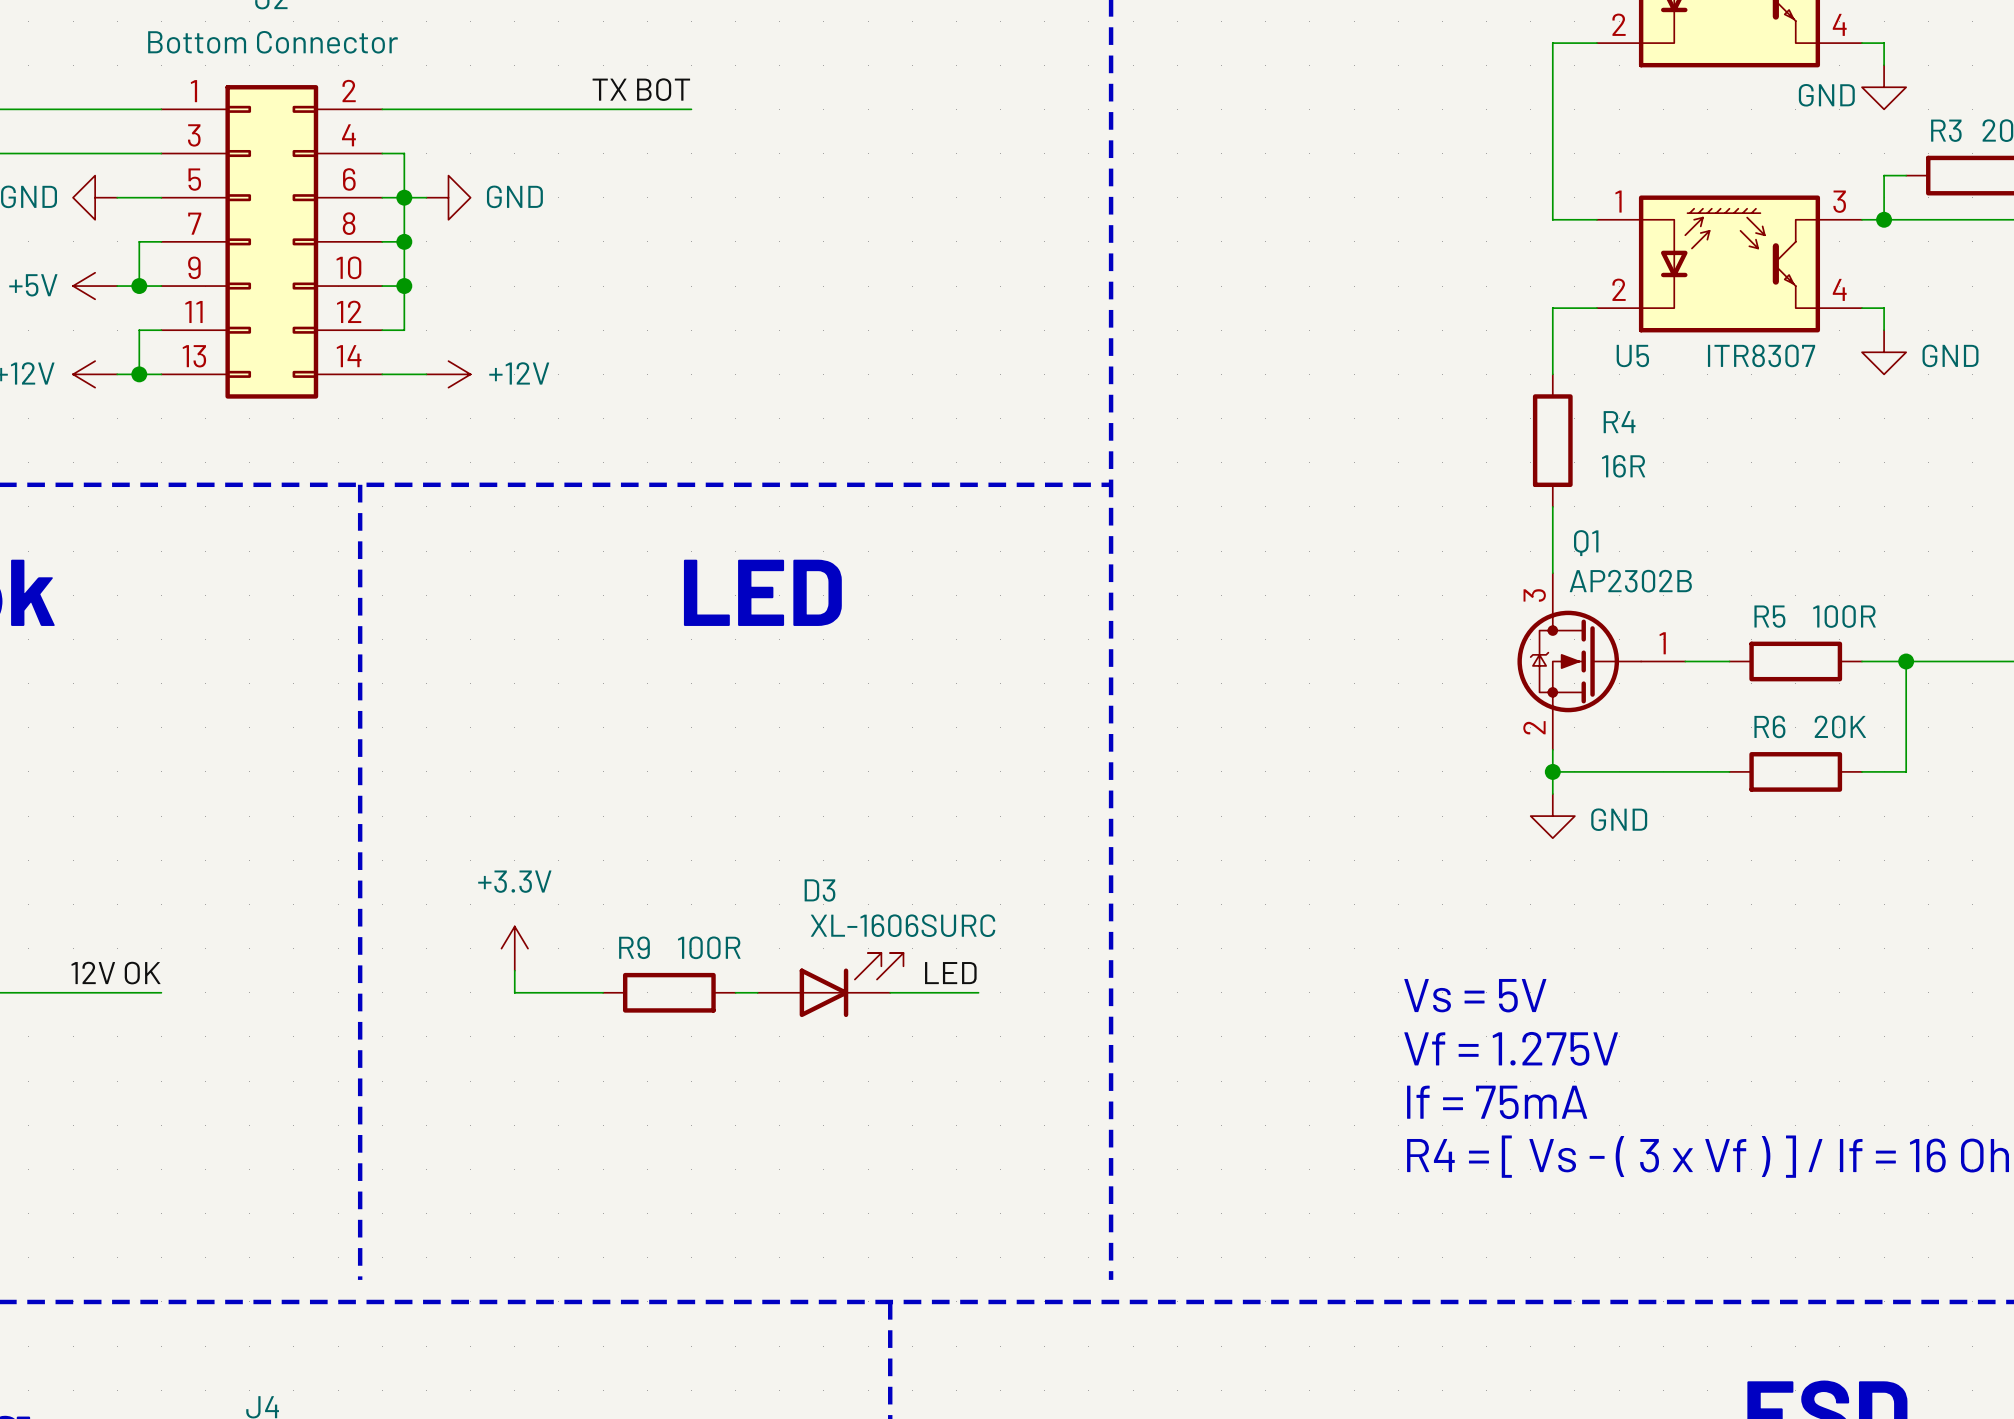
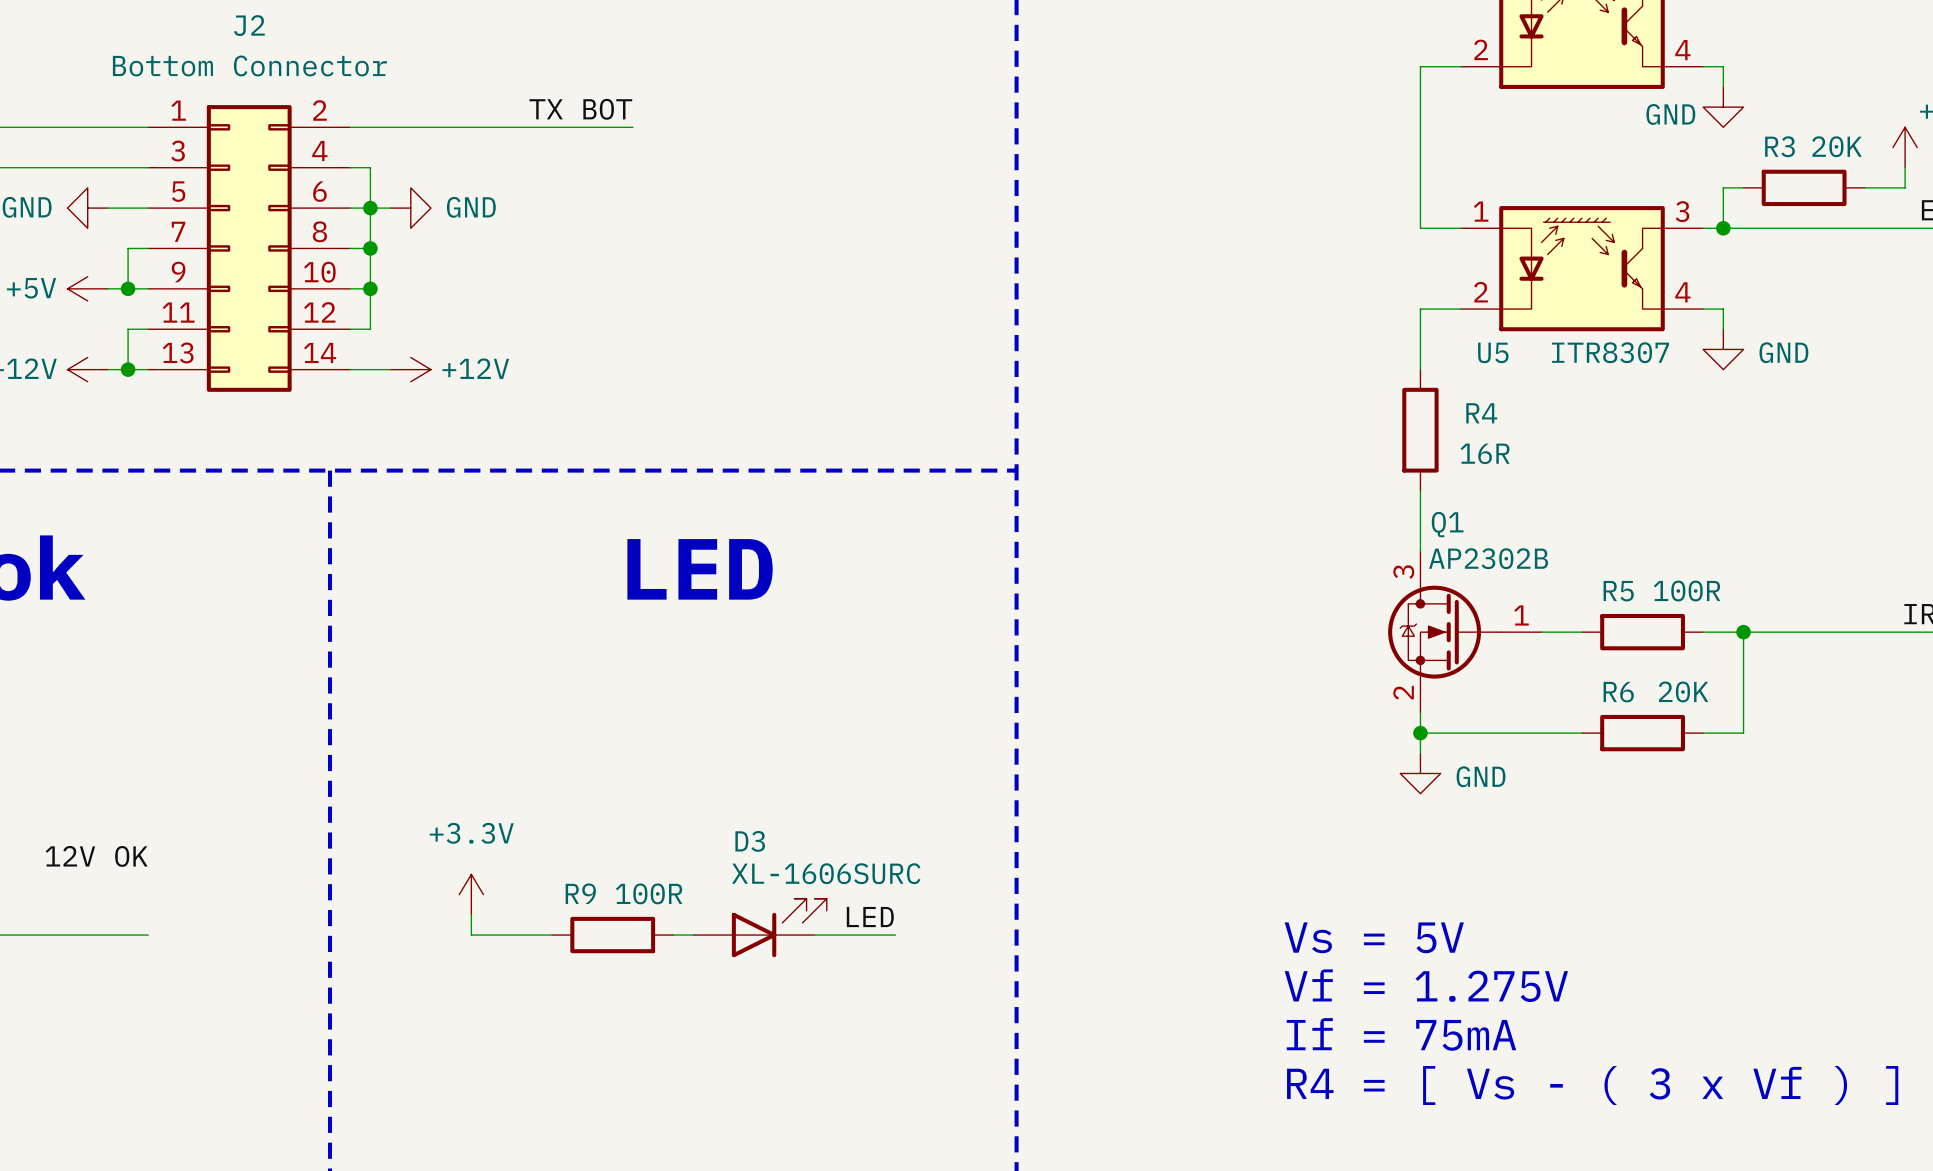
label position: 12V OK (116, 973) -> 12V OK (96, 856)

